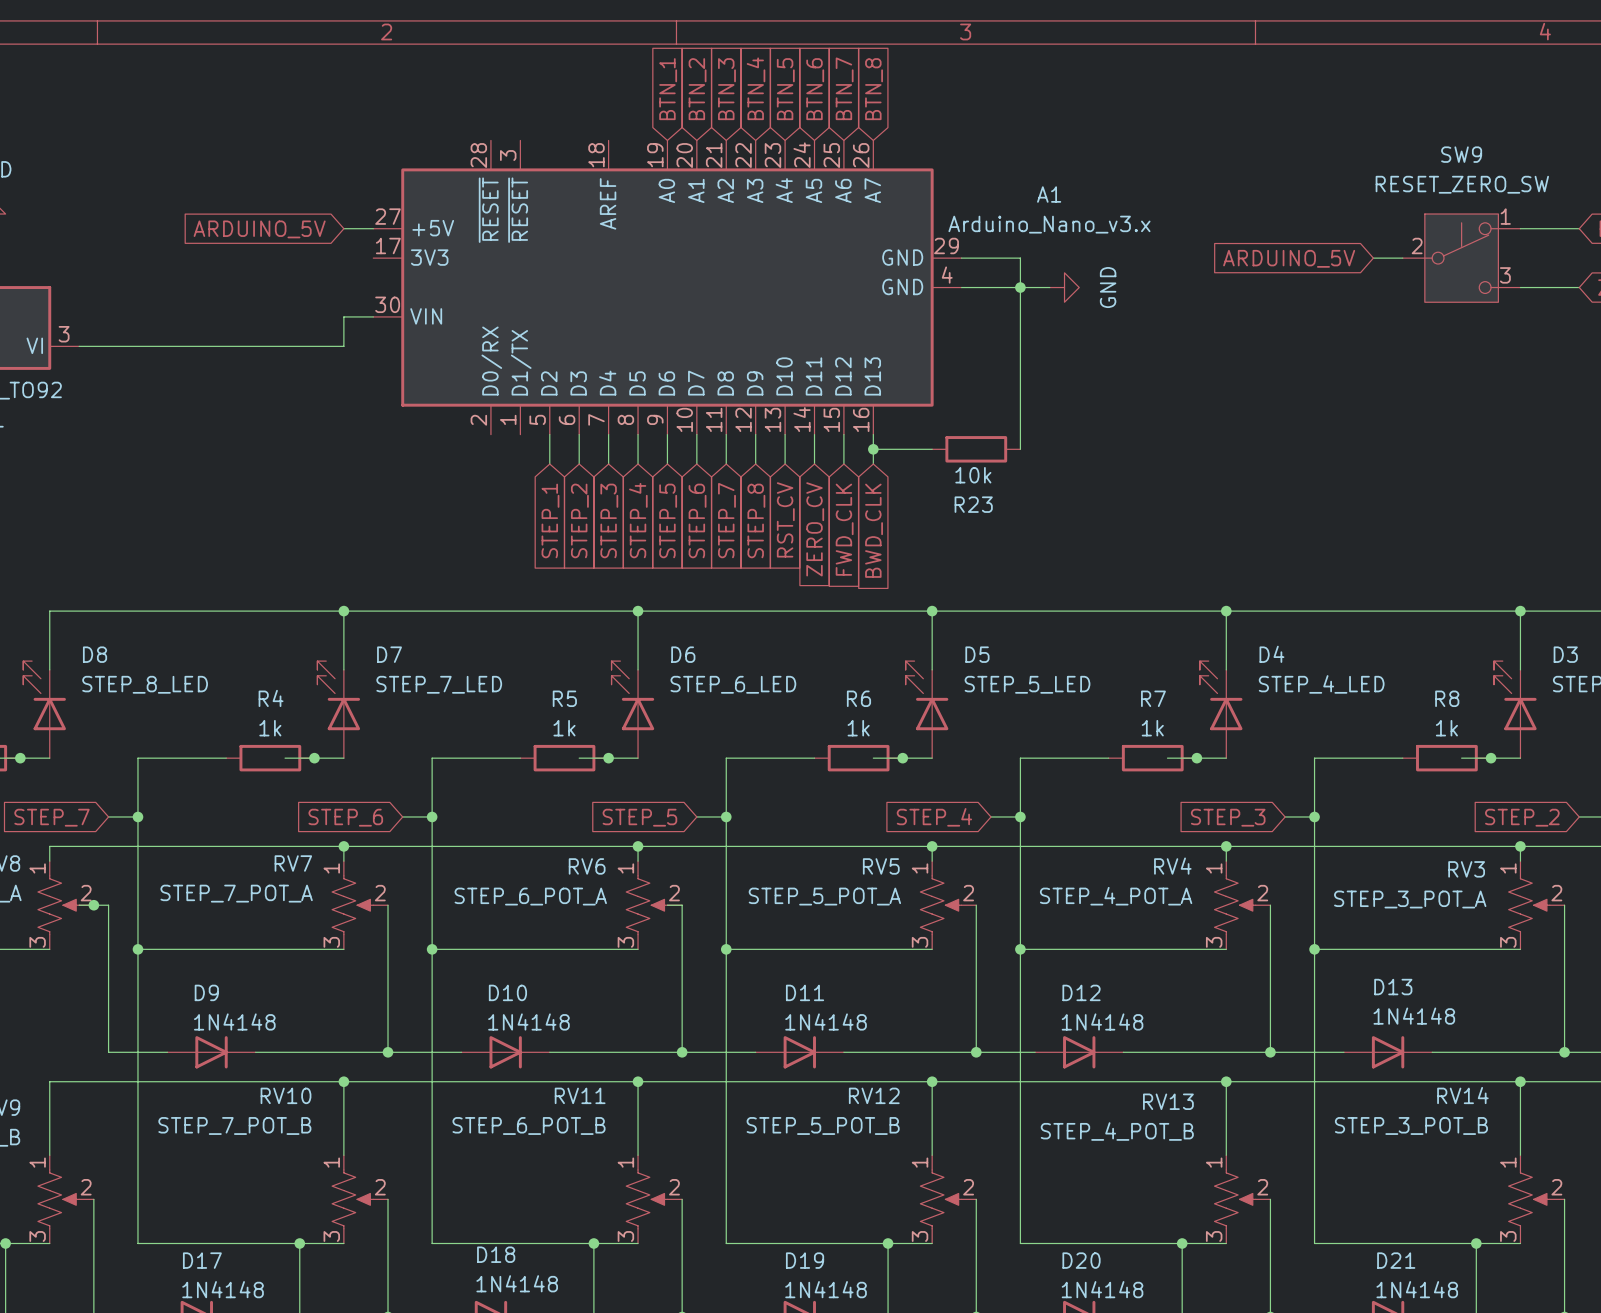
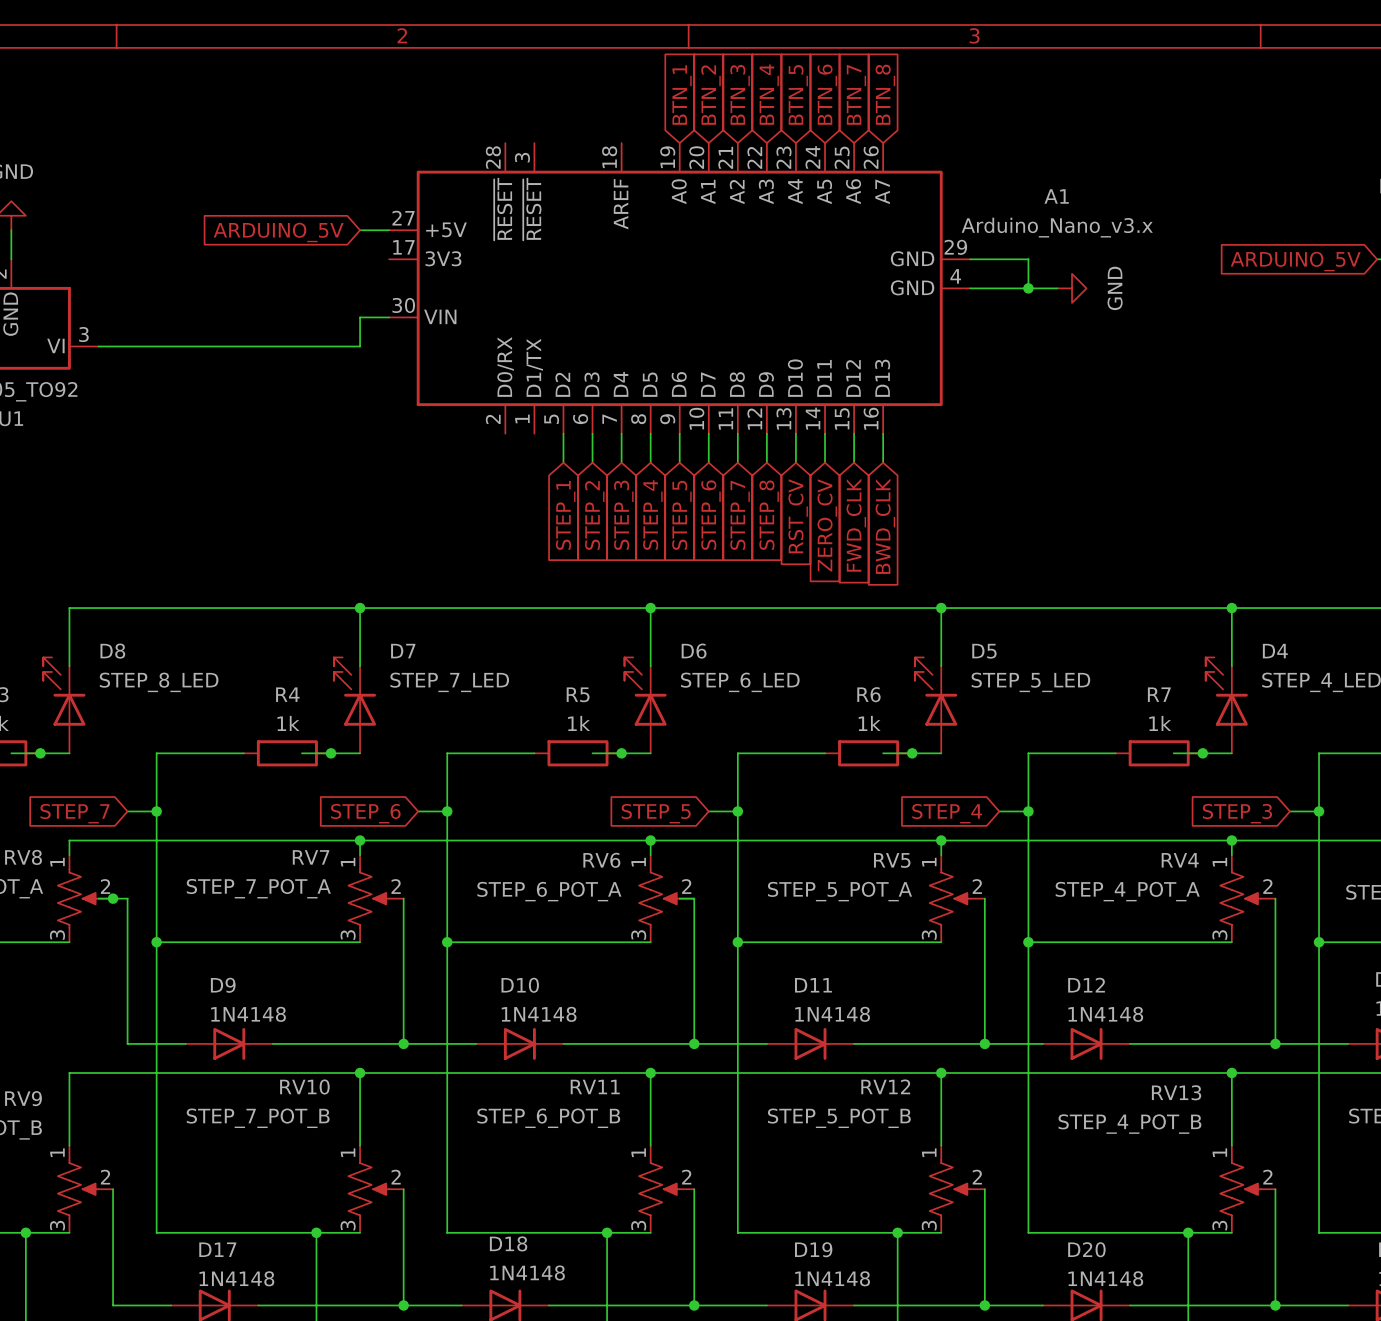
wire: (1020, 287) (1020, 449) -> none
wire: (873, 449) (932, 449) -> none
junction: (873, 449) -> none
R23: 10k (976, 449) -> none

